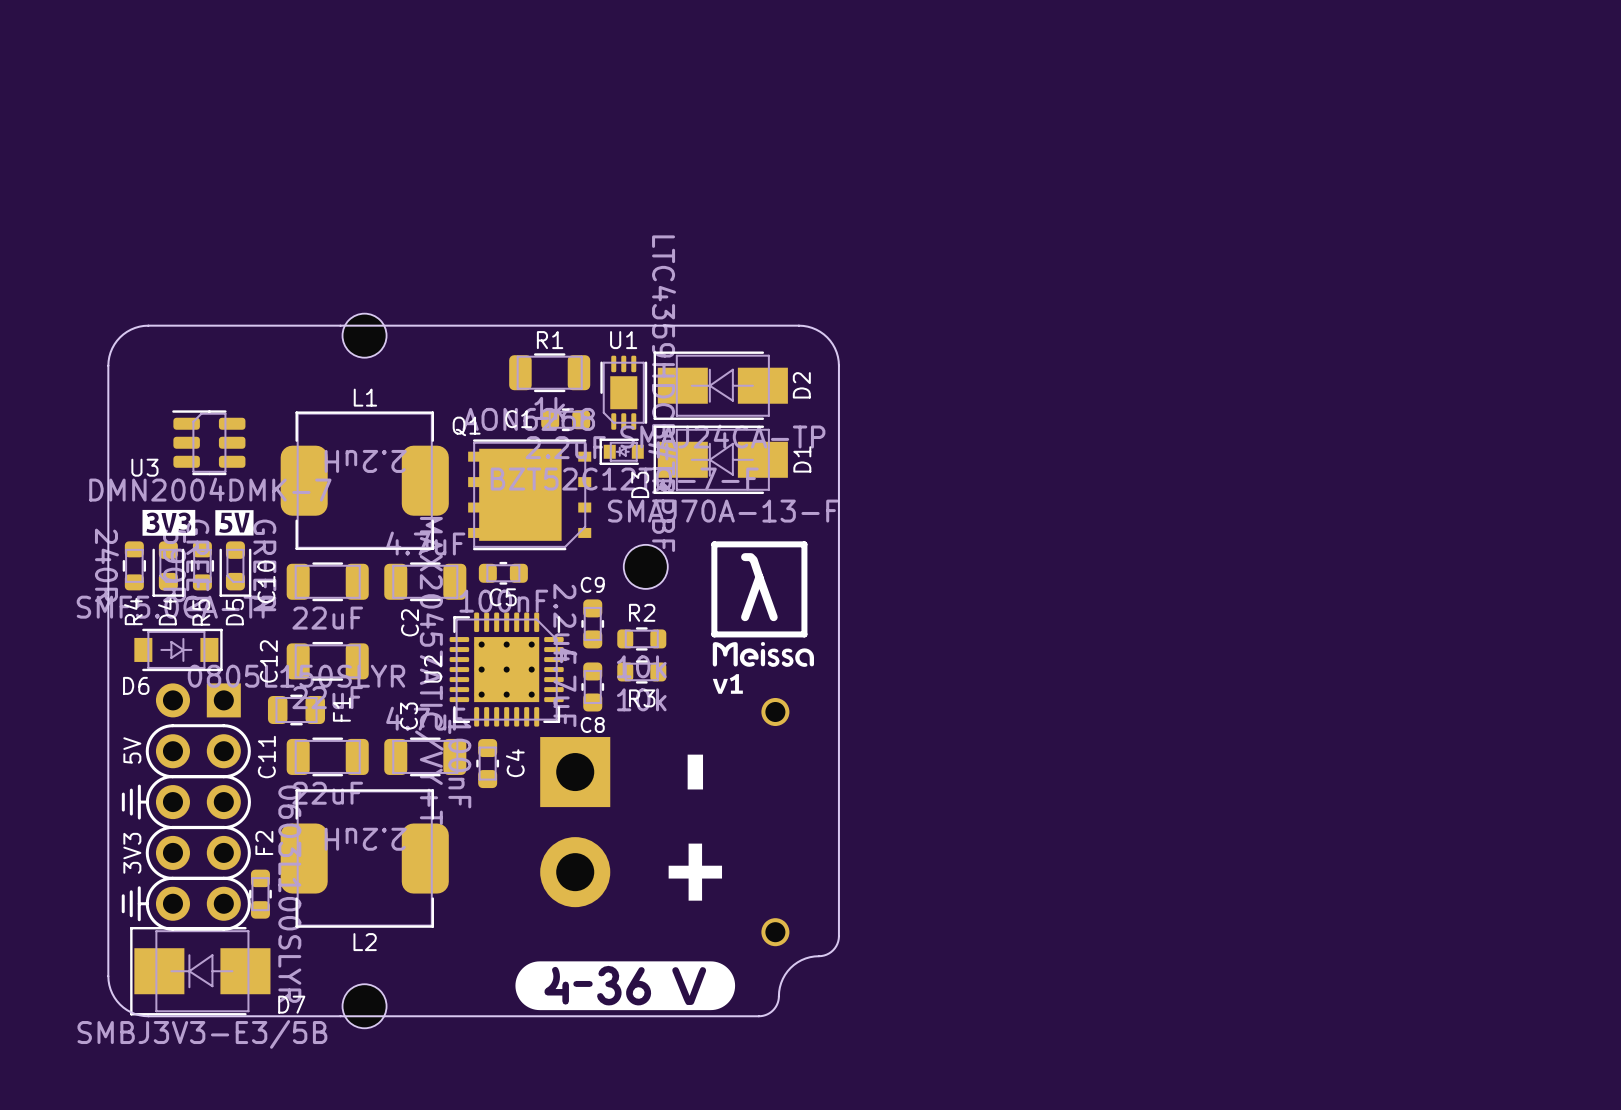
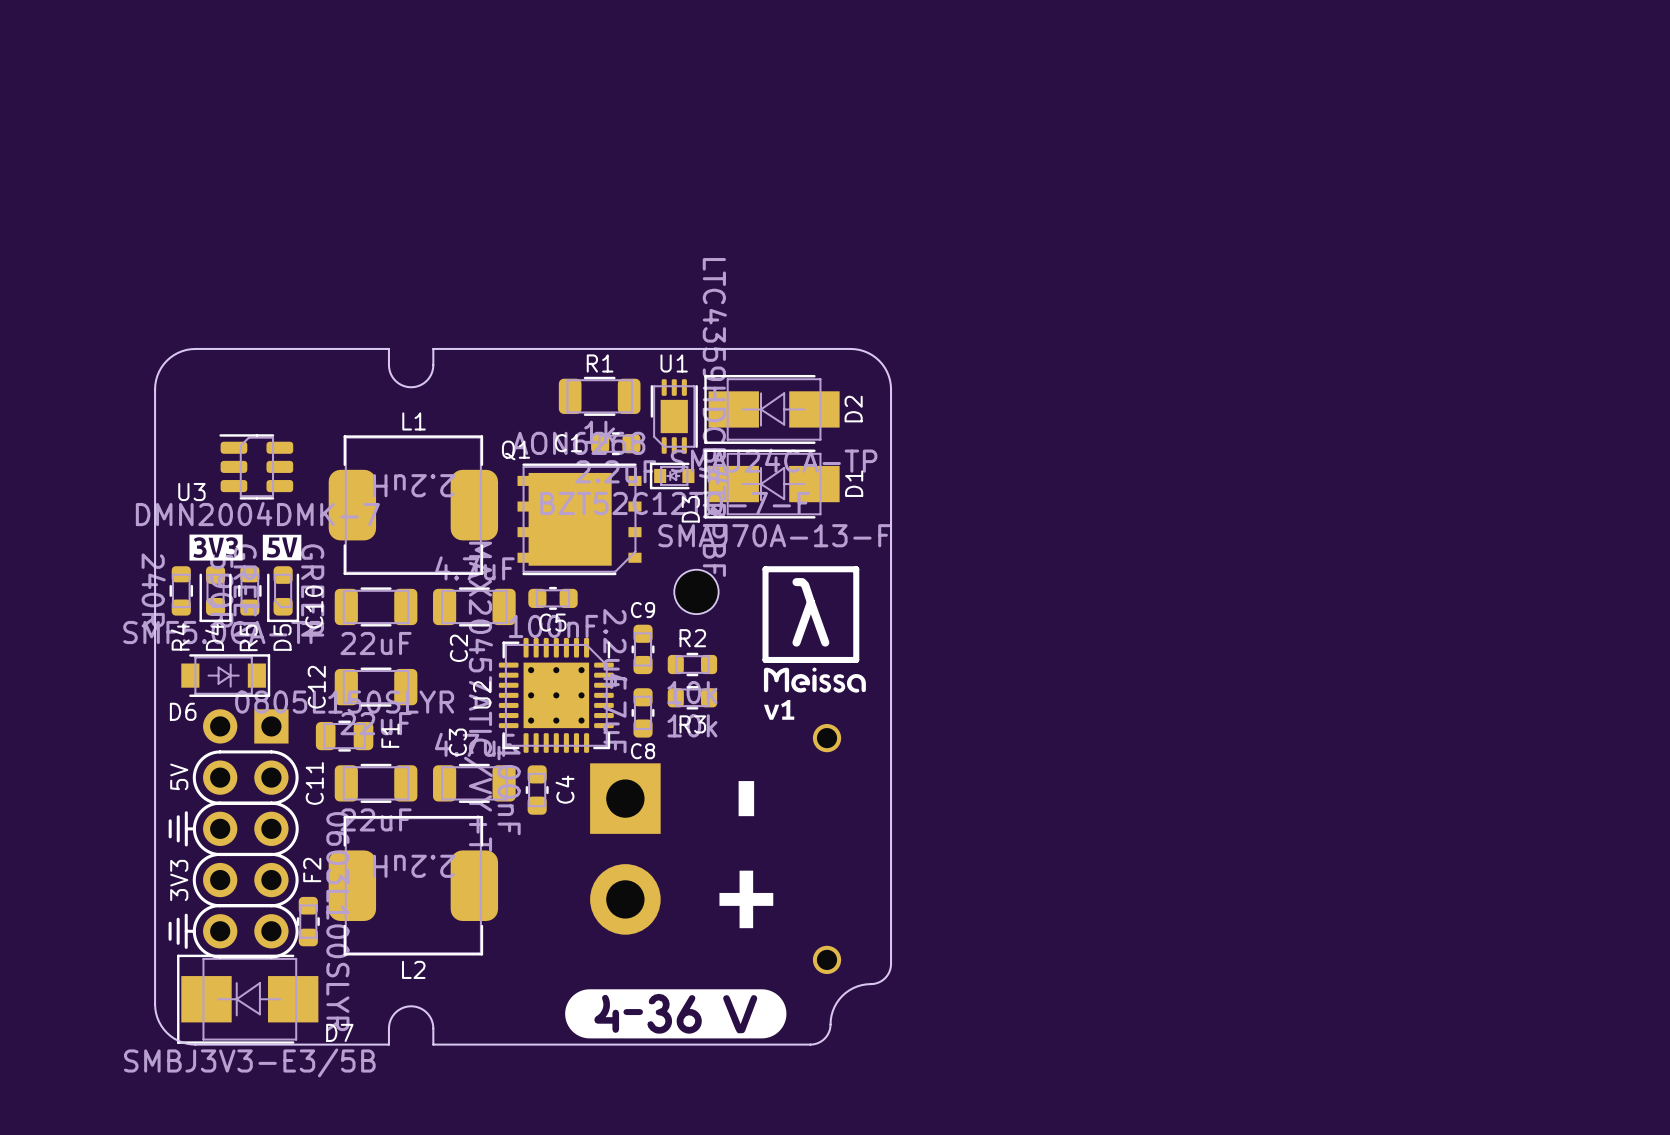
board edge: (384, 325) (340, 325) -> (433, 348) (433, 367) (430, 375) (423, 383) (411, 387) (398, 383) (391, 375) (389, 367) (388, 348)
part: (364, 335) -> none
part: (364, 1006) -> none
board edge: (384, 1016) (340, 1016) -> (433, 1044) (433, 1025) (430, 1018) (423, 1010) (411, 1006) (398, 1010) (391, 1018) (389, 1025) (388, 1044)

